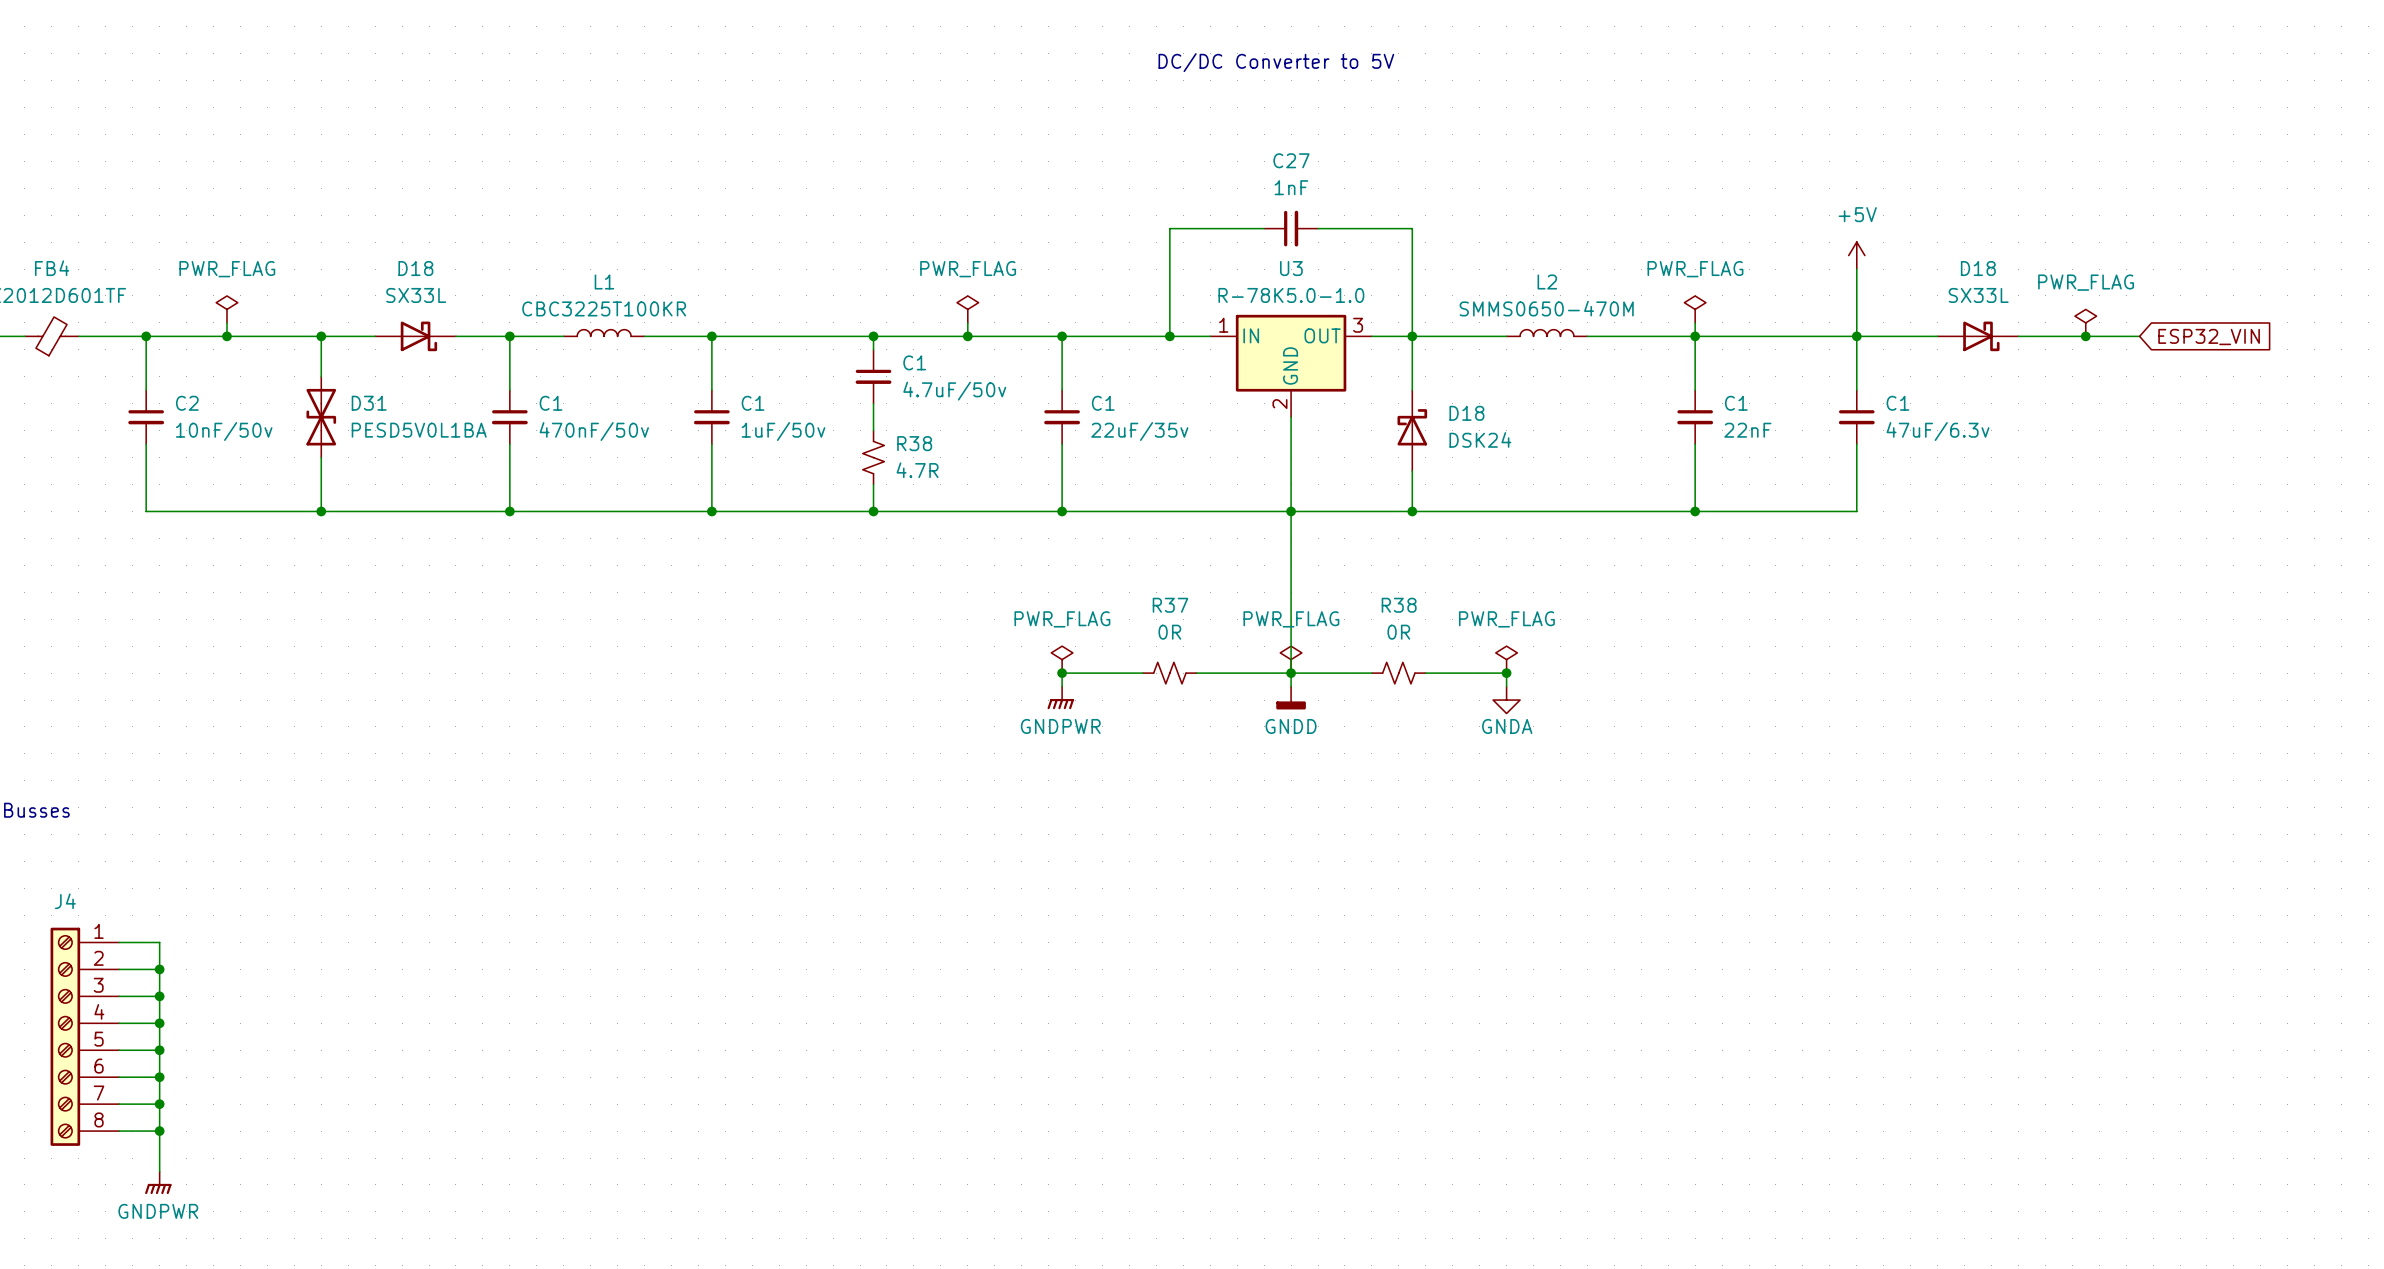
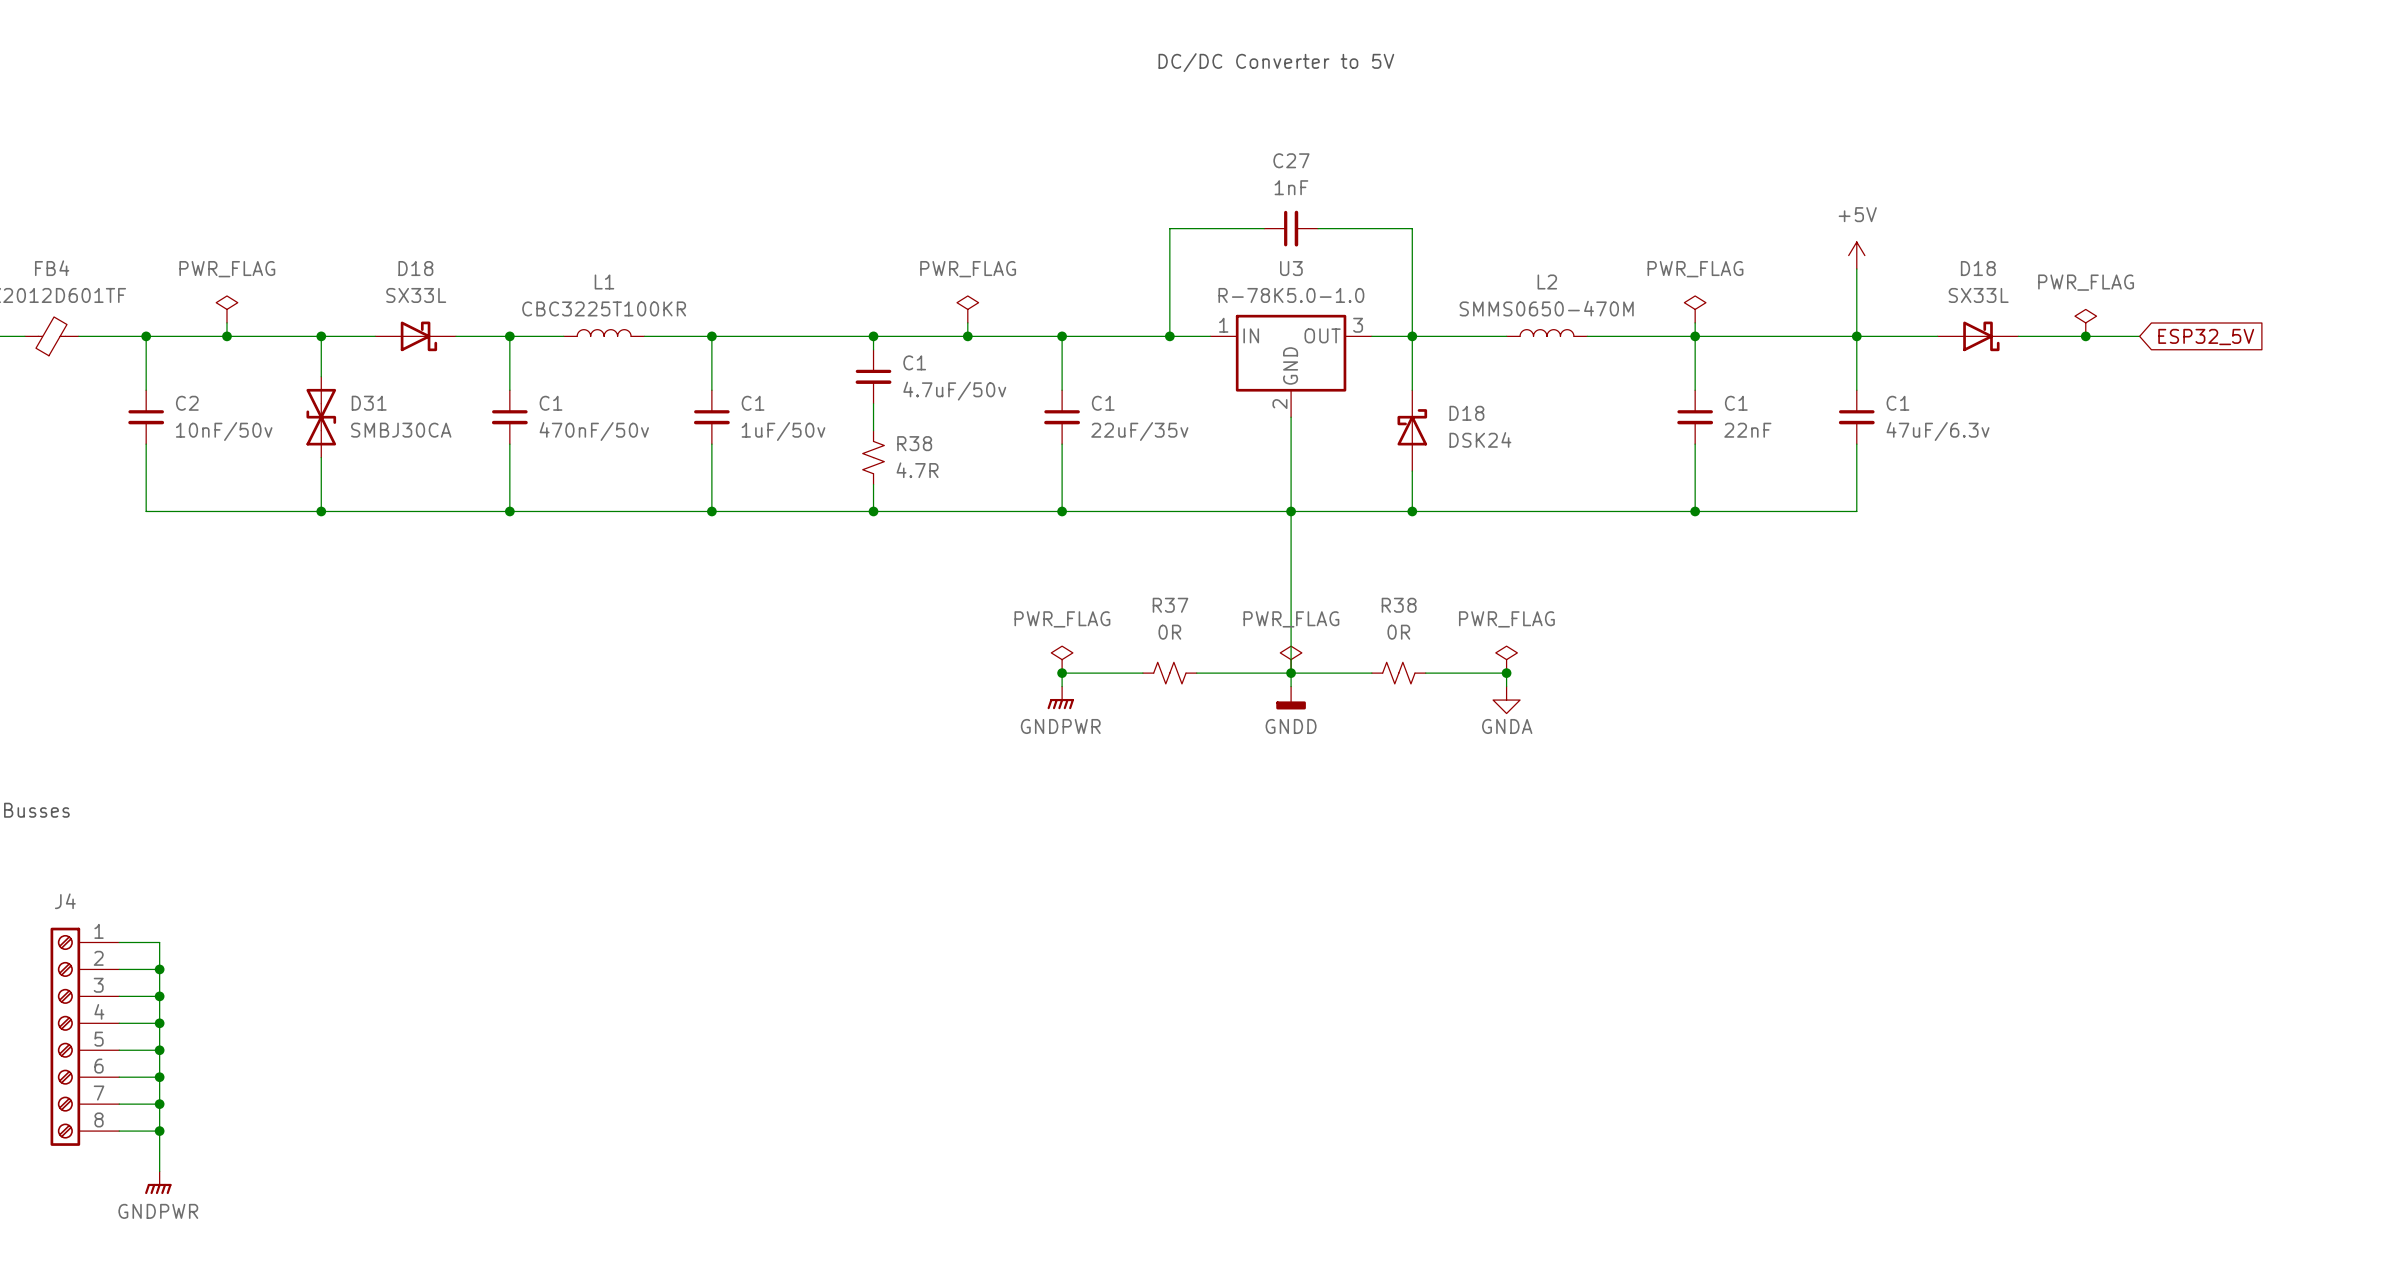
global label: ESP32_VIN (2209, 337) -> ESP32_5V (2206, 337)
D31 value: PESD5V0L1BA (419, 430) -> SMBJ30CA (401, 430)

